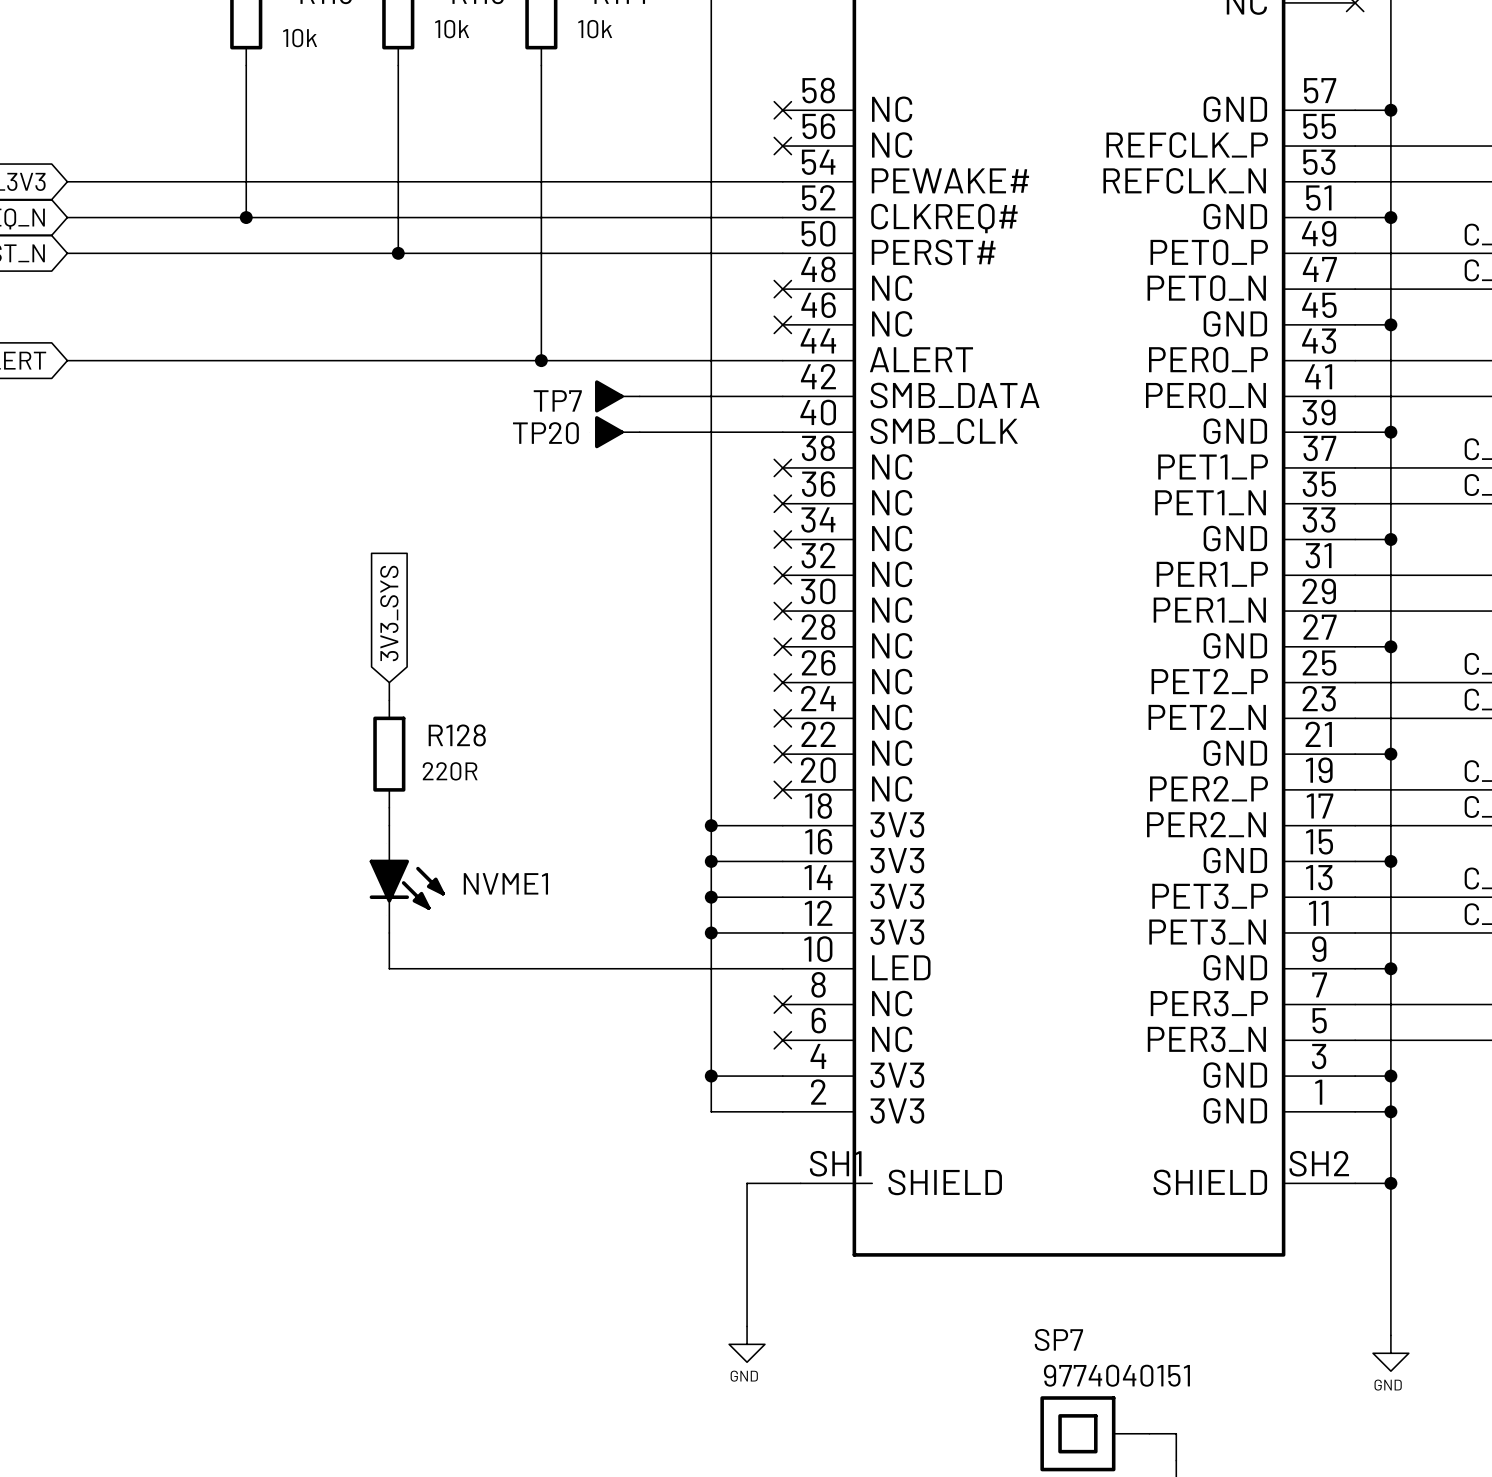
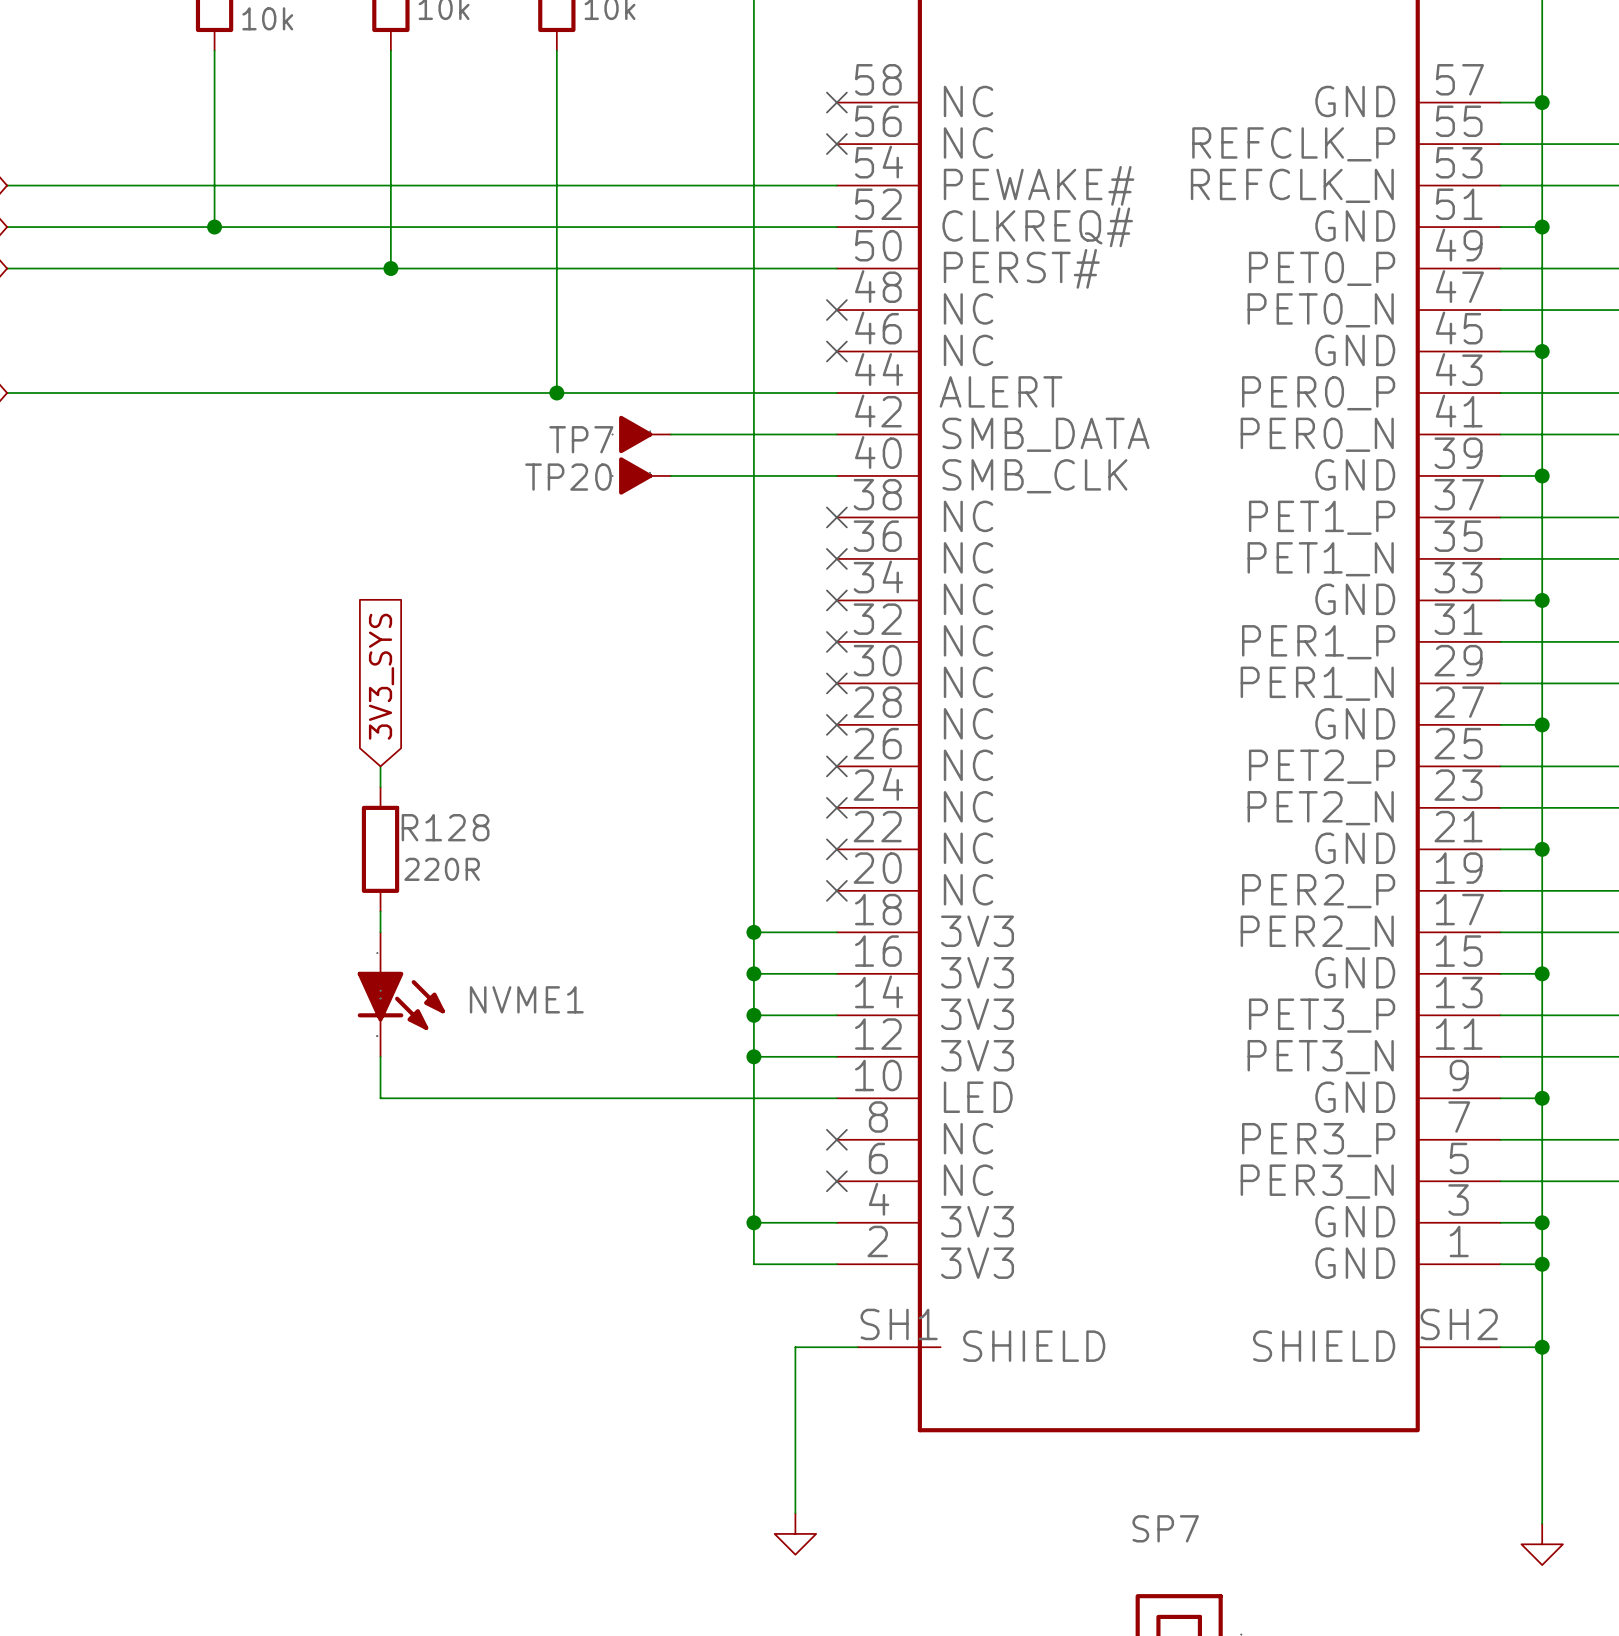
SP7 value: 9774040151 (1116, 1375) -> none
power symbol text: GND (744, 1376) -> none
power symbol text: GND (1388, 1385) -> none

